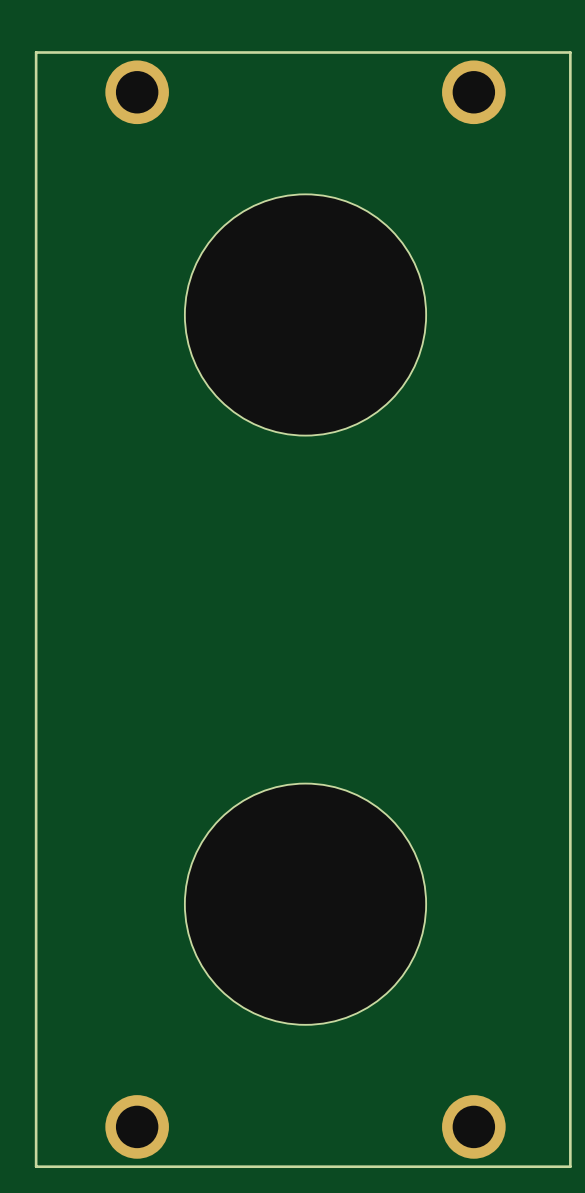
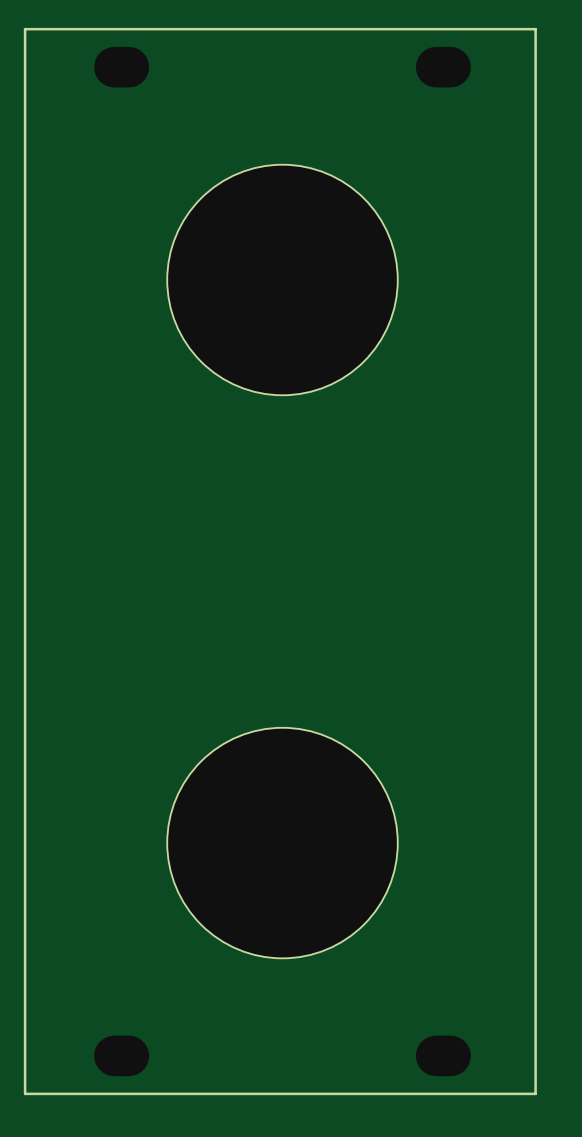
part footprint: [105, 60, 169, 125] -> [94, 46, 150, 88]
part footprint: [442, 60, 506, 125] -> [415, 46, 471, 88]
part footprint: [105, 1095, 169, 1159] -> [94, 1035, 150, 1077]
part footprint: [442, 1095, 506, 1159] -> [415, 1035, 471, 1077]

